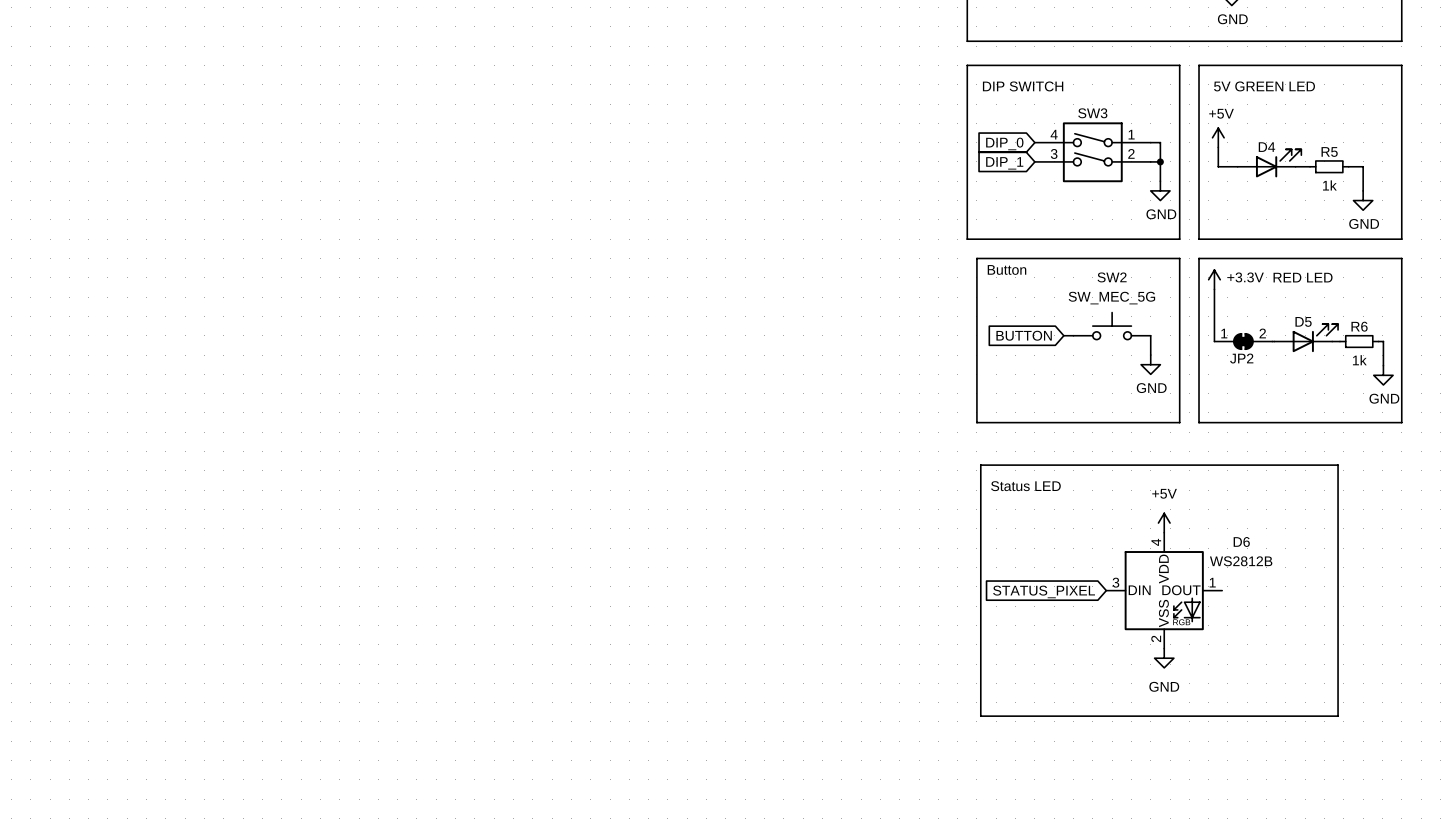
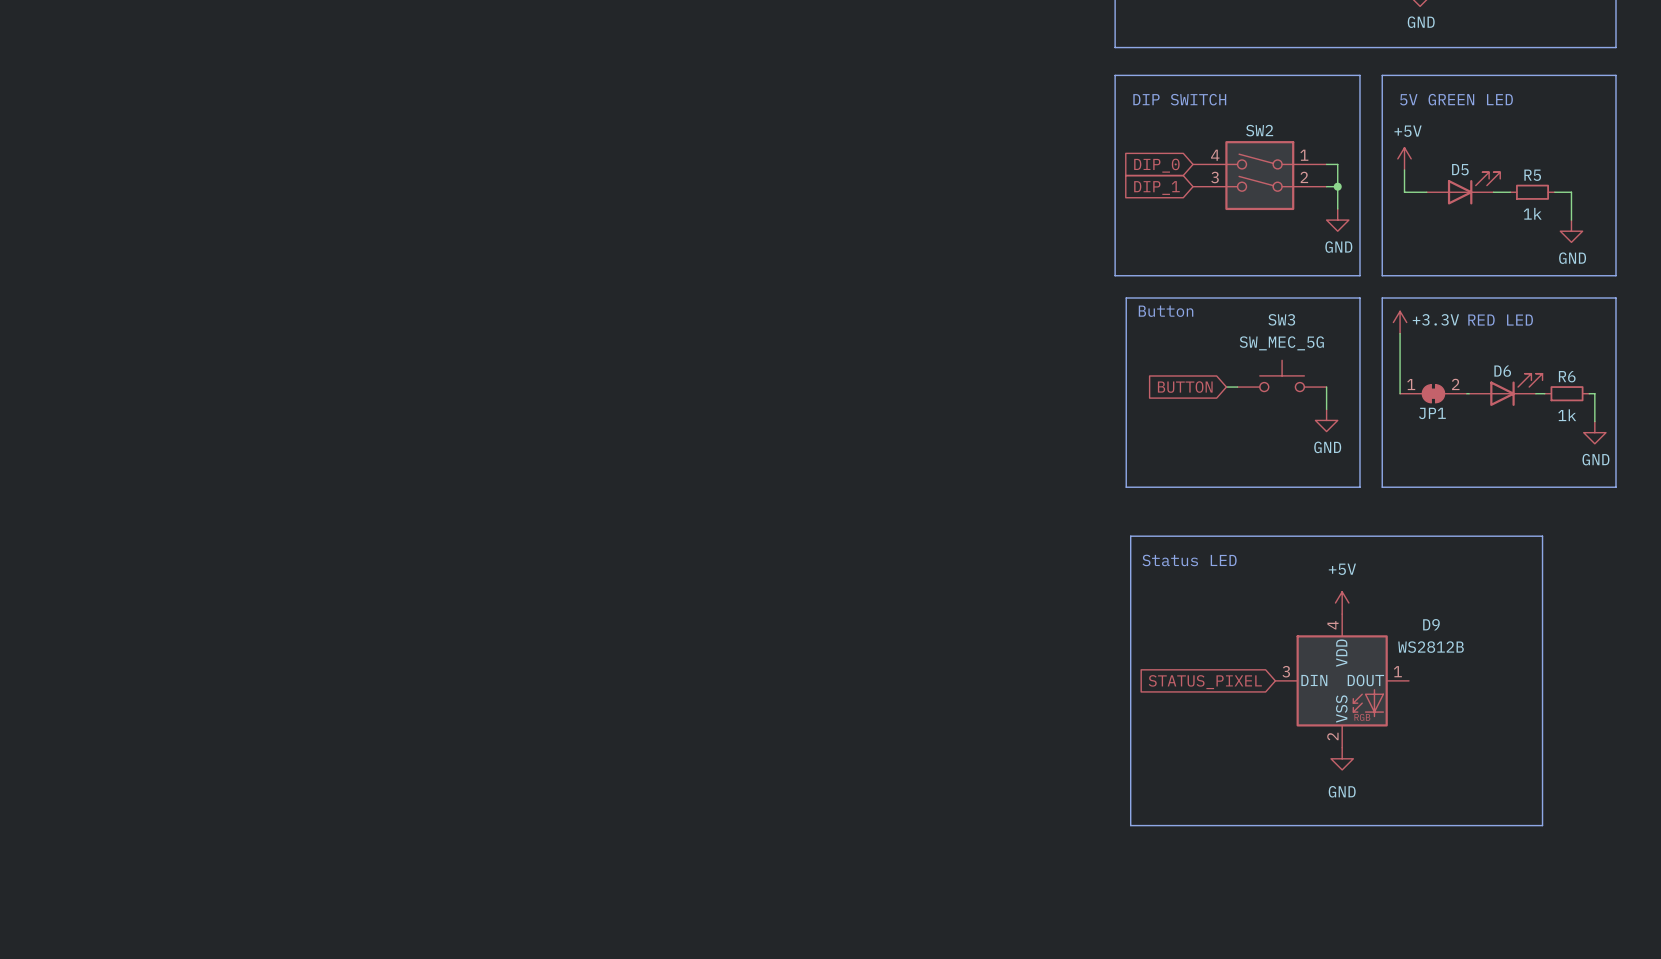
SW3 name: SW3 (1092, 113) -> SW2 (1259, 130)
D4 name: D4 (1266, 147) -> D5 (1460, 169)
SW2 name: SW2 (1112, 277) -> SW3 (1281, 319)
D5 name: D5 (1303, 321) -> D6 (1502, 371)
JP2 name: JP2 (1241, 358) -> JP1 (1432, 413)
D6 name: D6 (1241, 541) -> D9 (1431, 624)

